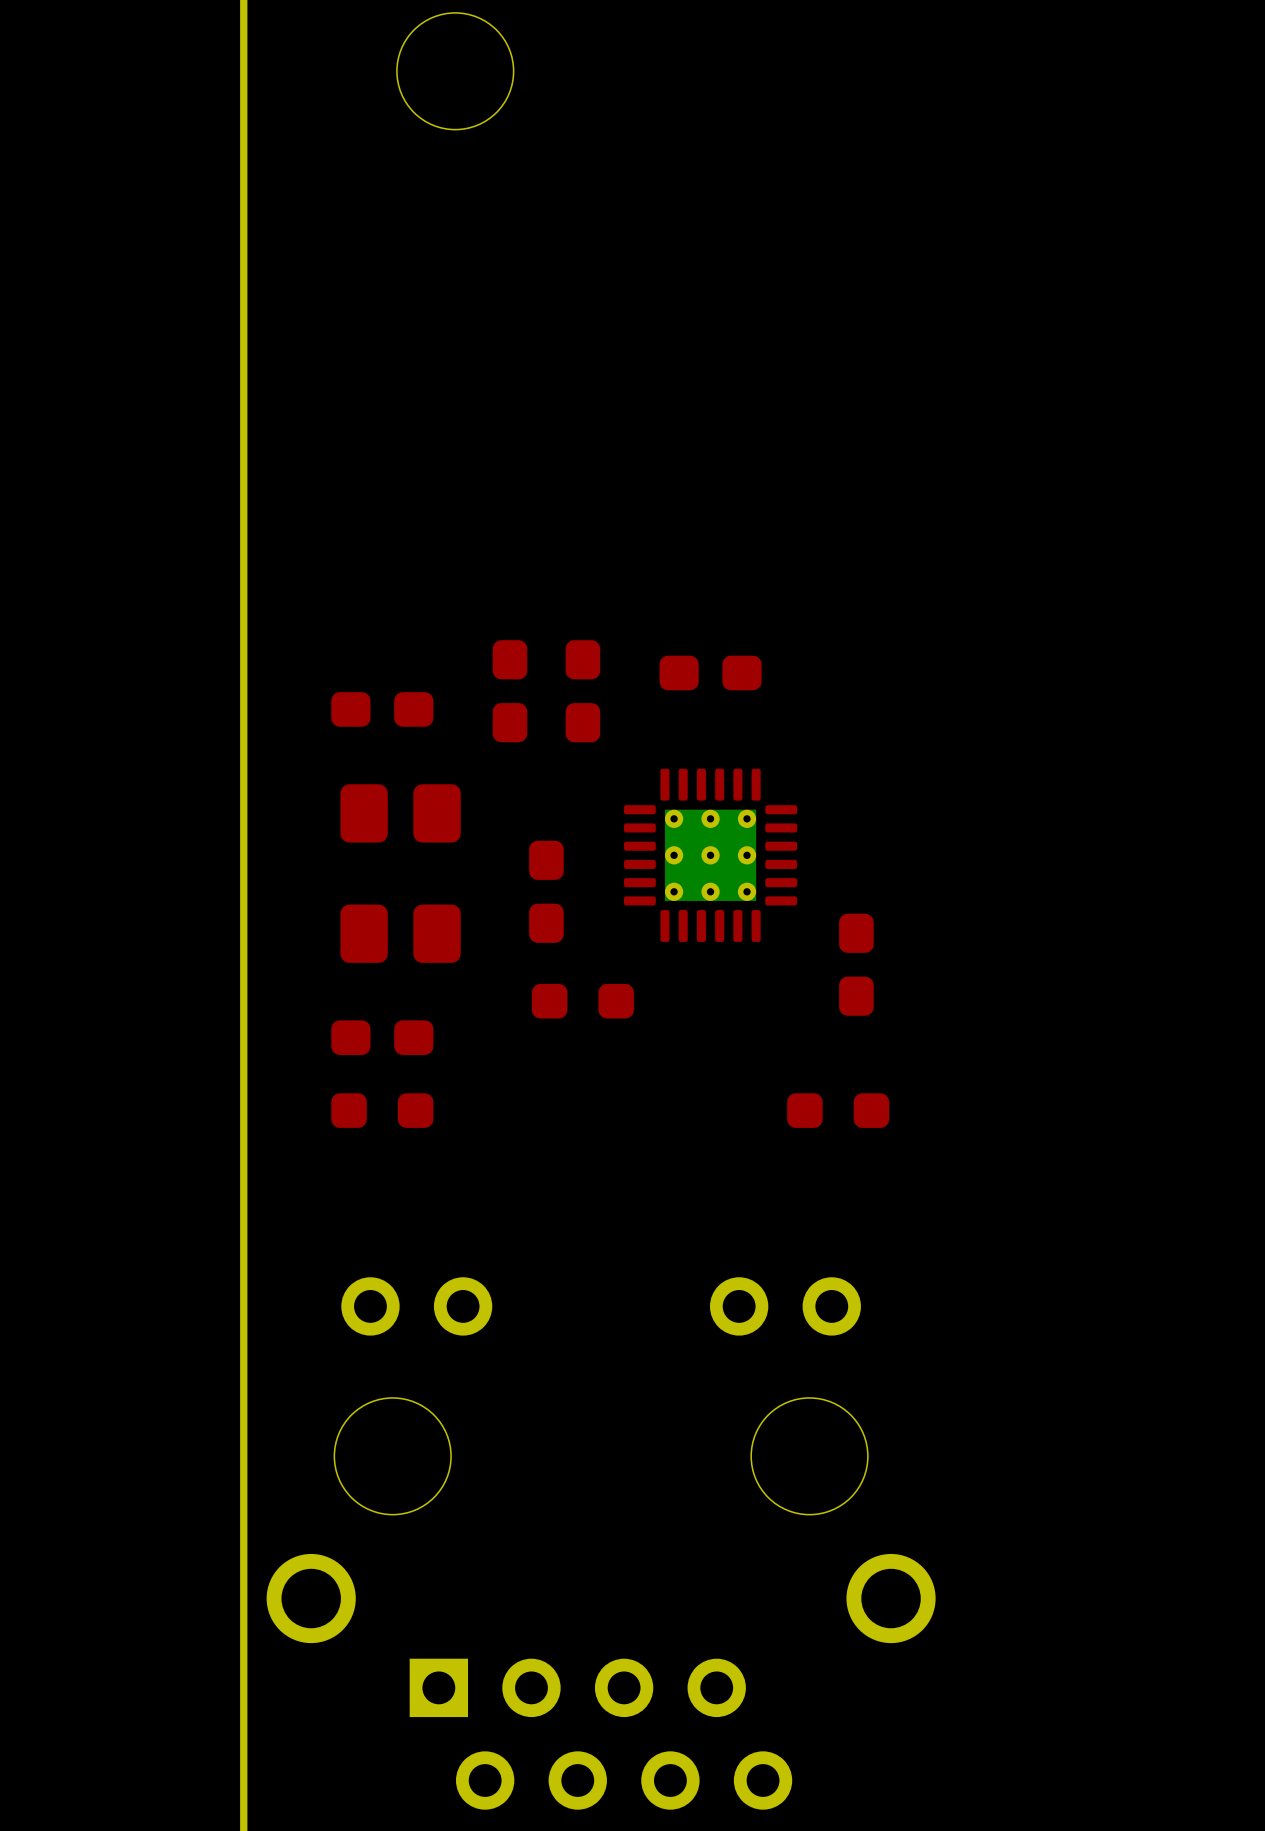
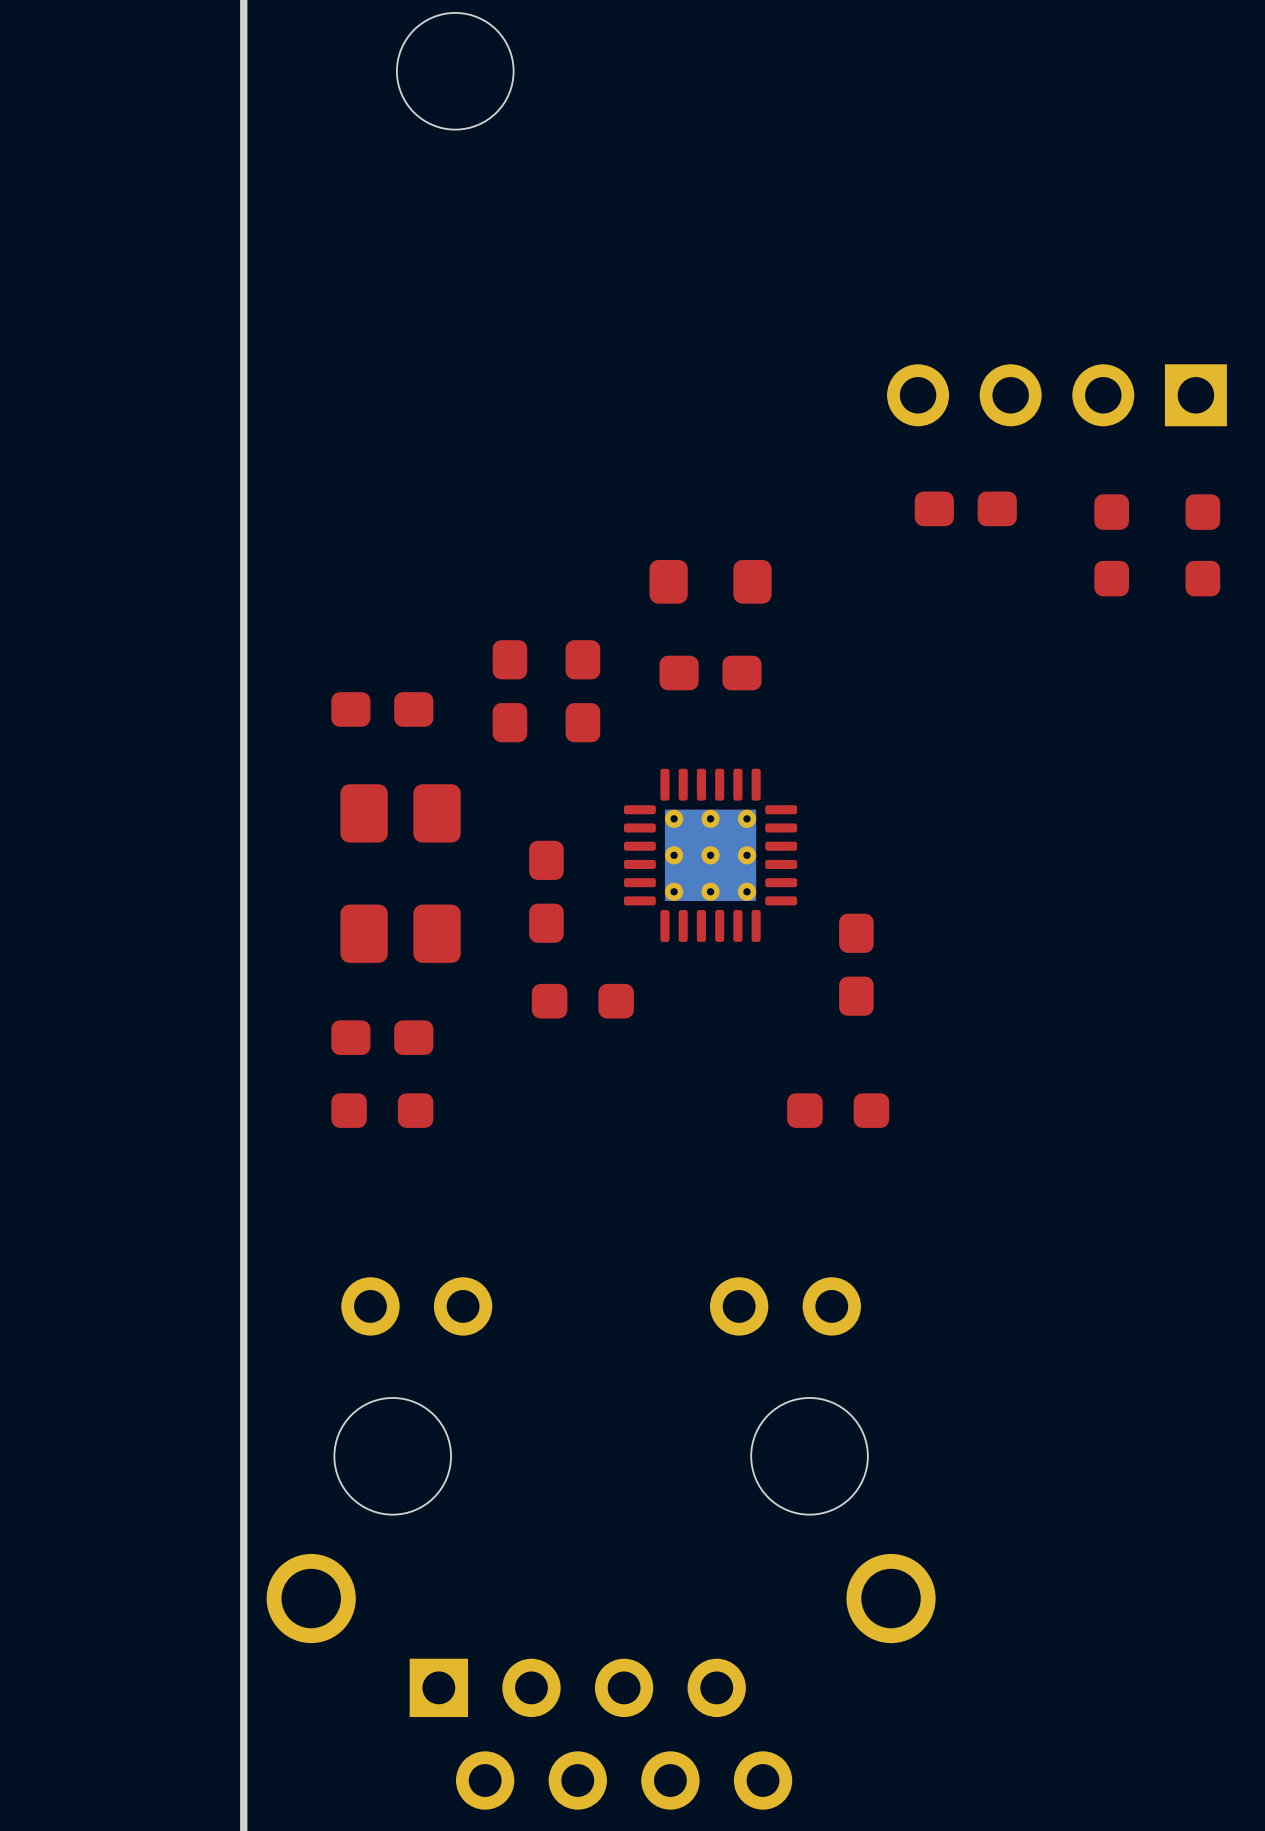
part: none -> (1056, 395)
part: none -> (965, 508)
part: none -> (1111, 545)
part: none -> (1202, 545)
part: none -> (710, 581)

